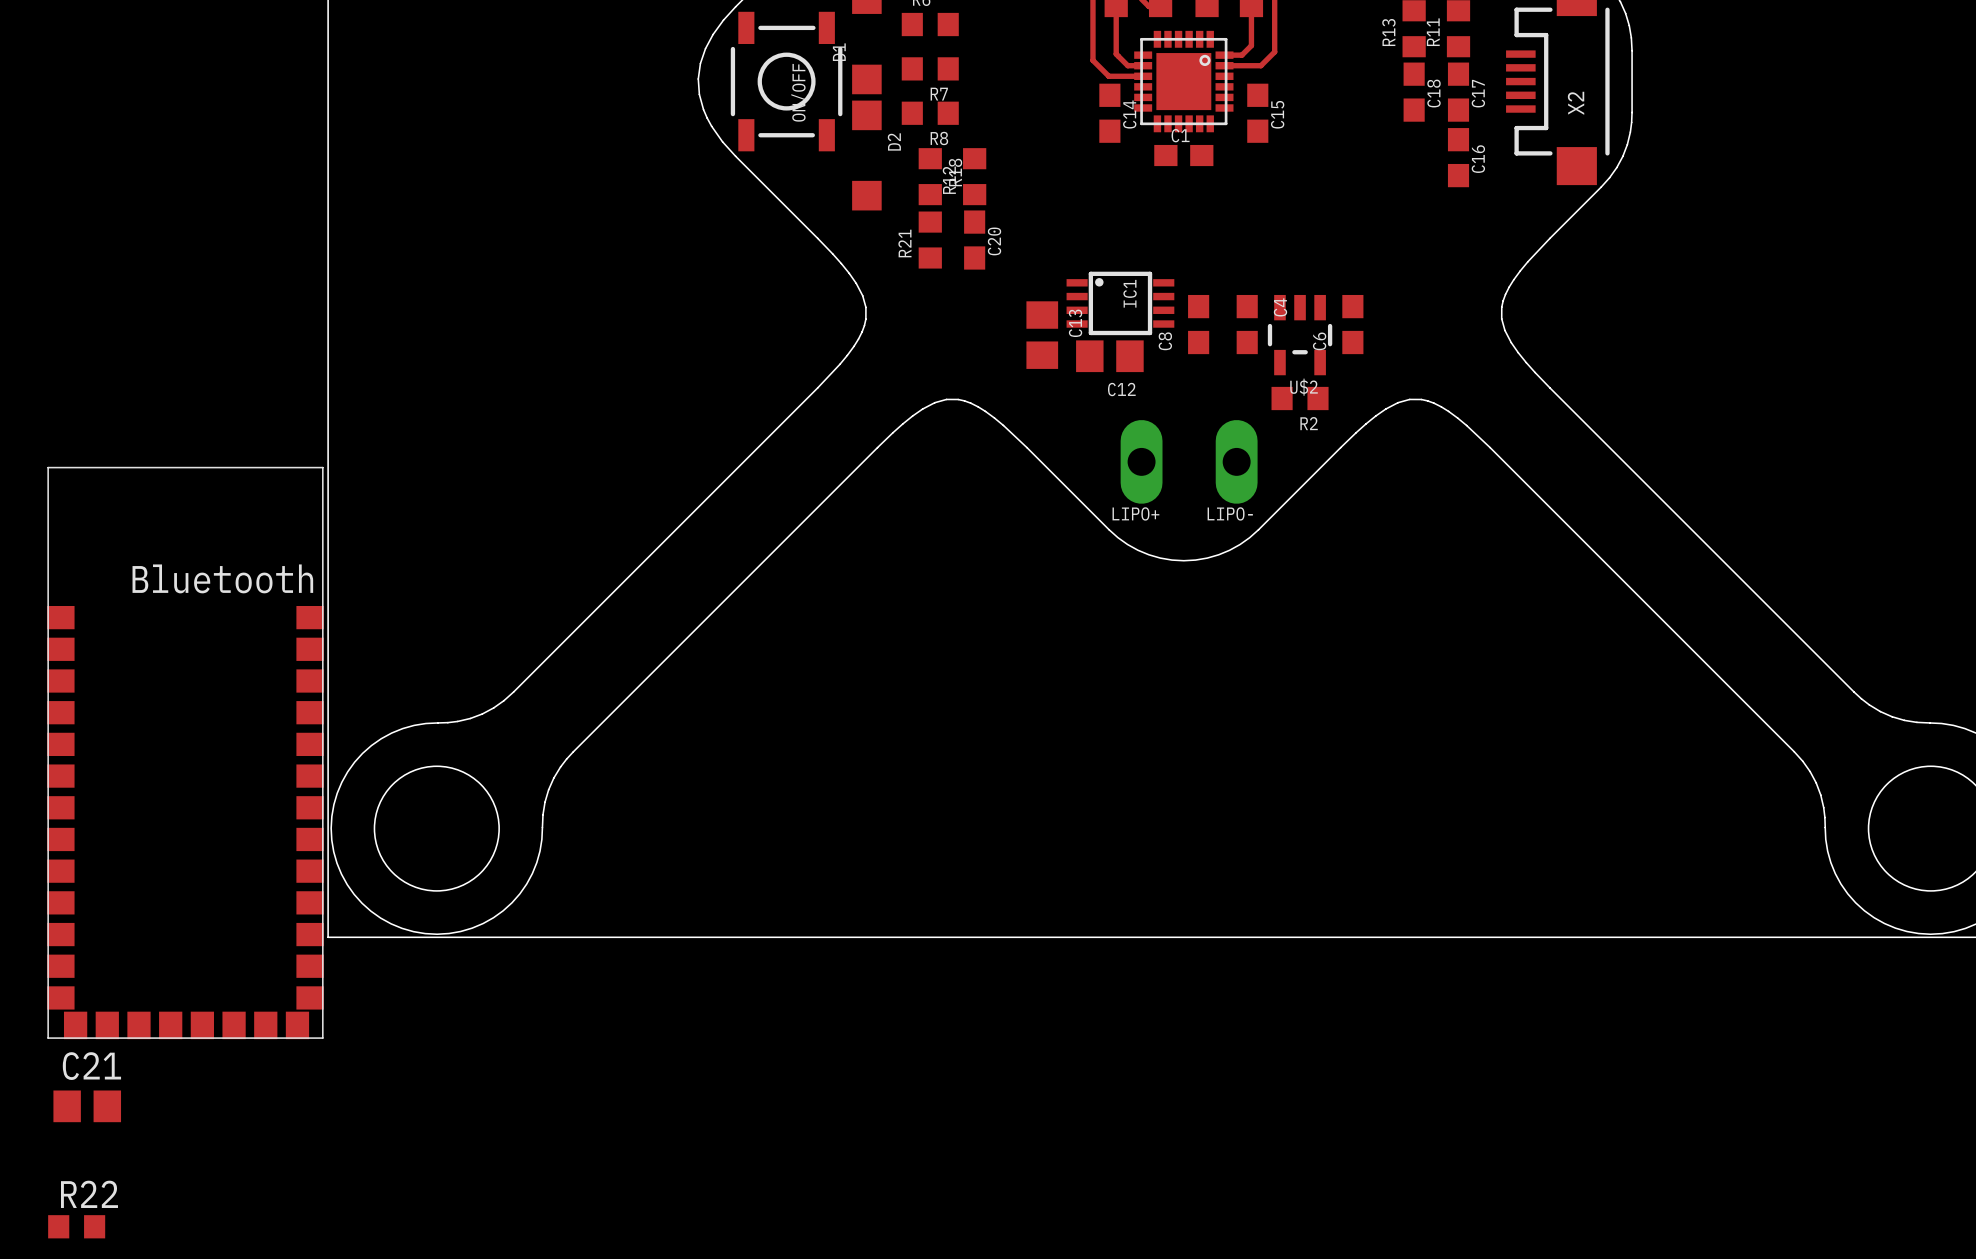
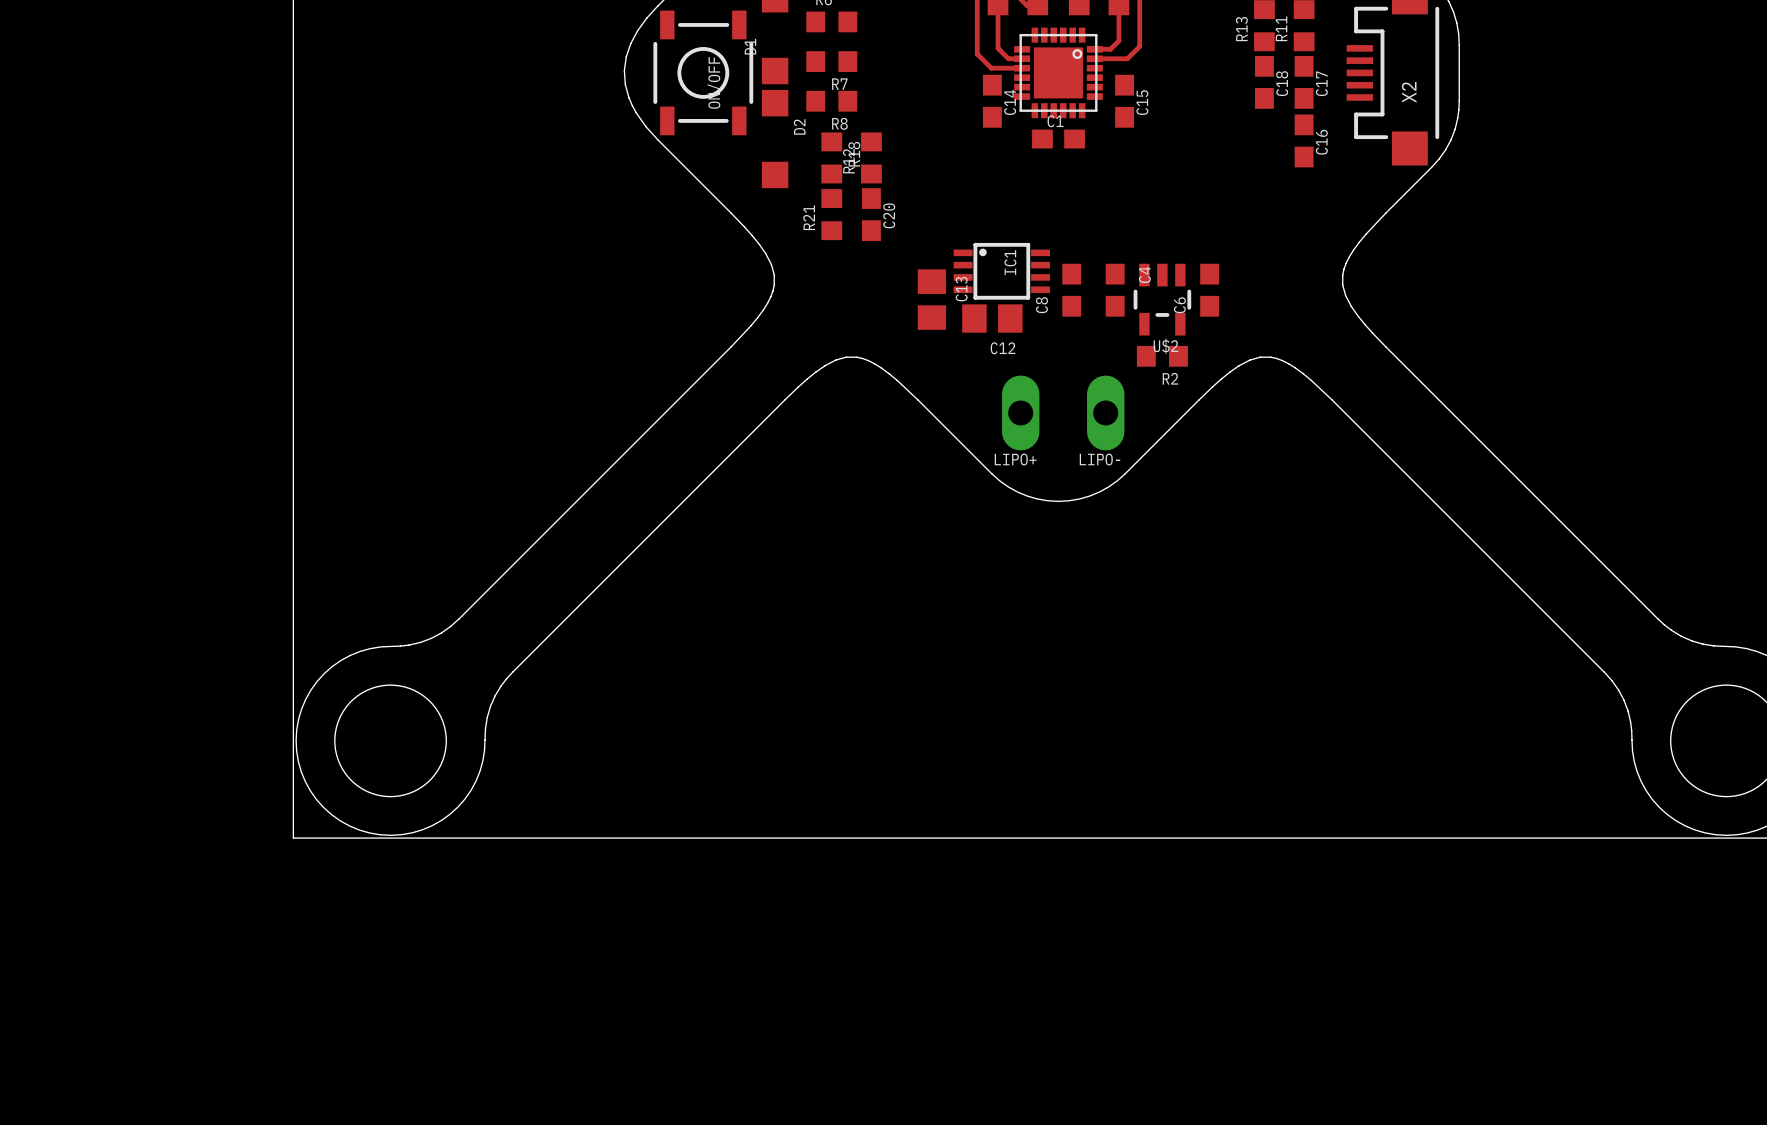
part: (185, 753) -> none
C21: (87, 1106) -> none
R22: (76, 1226) -> none

